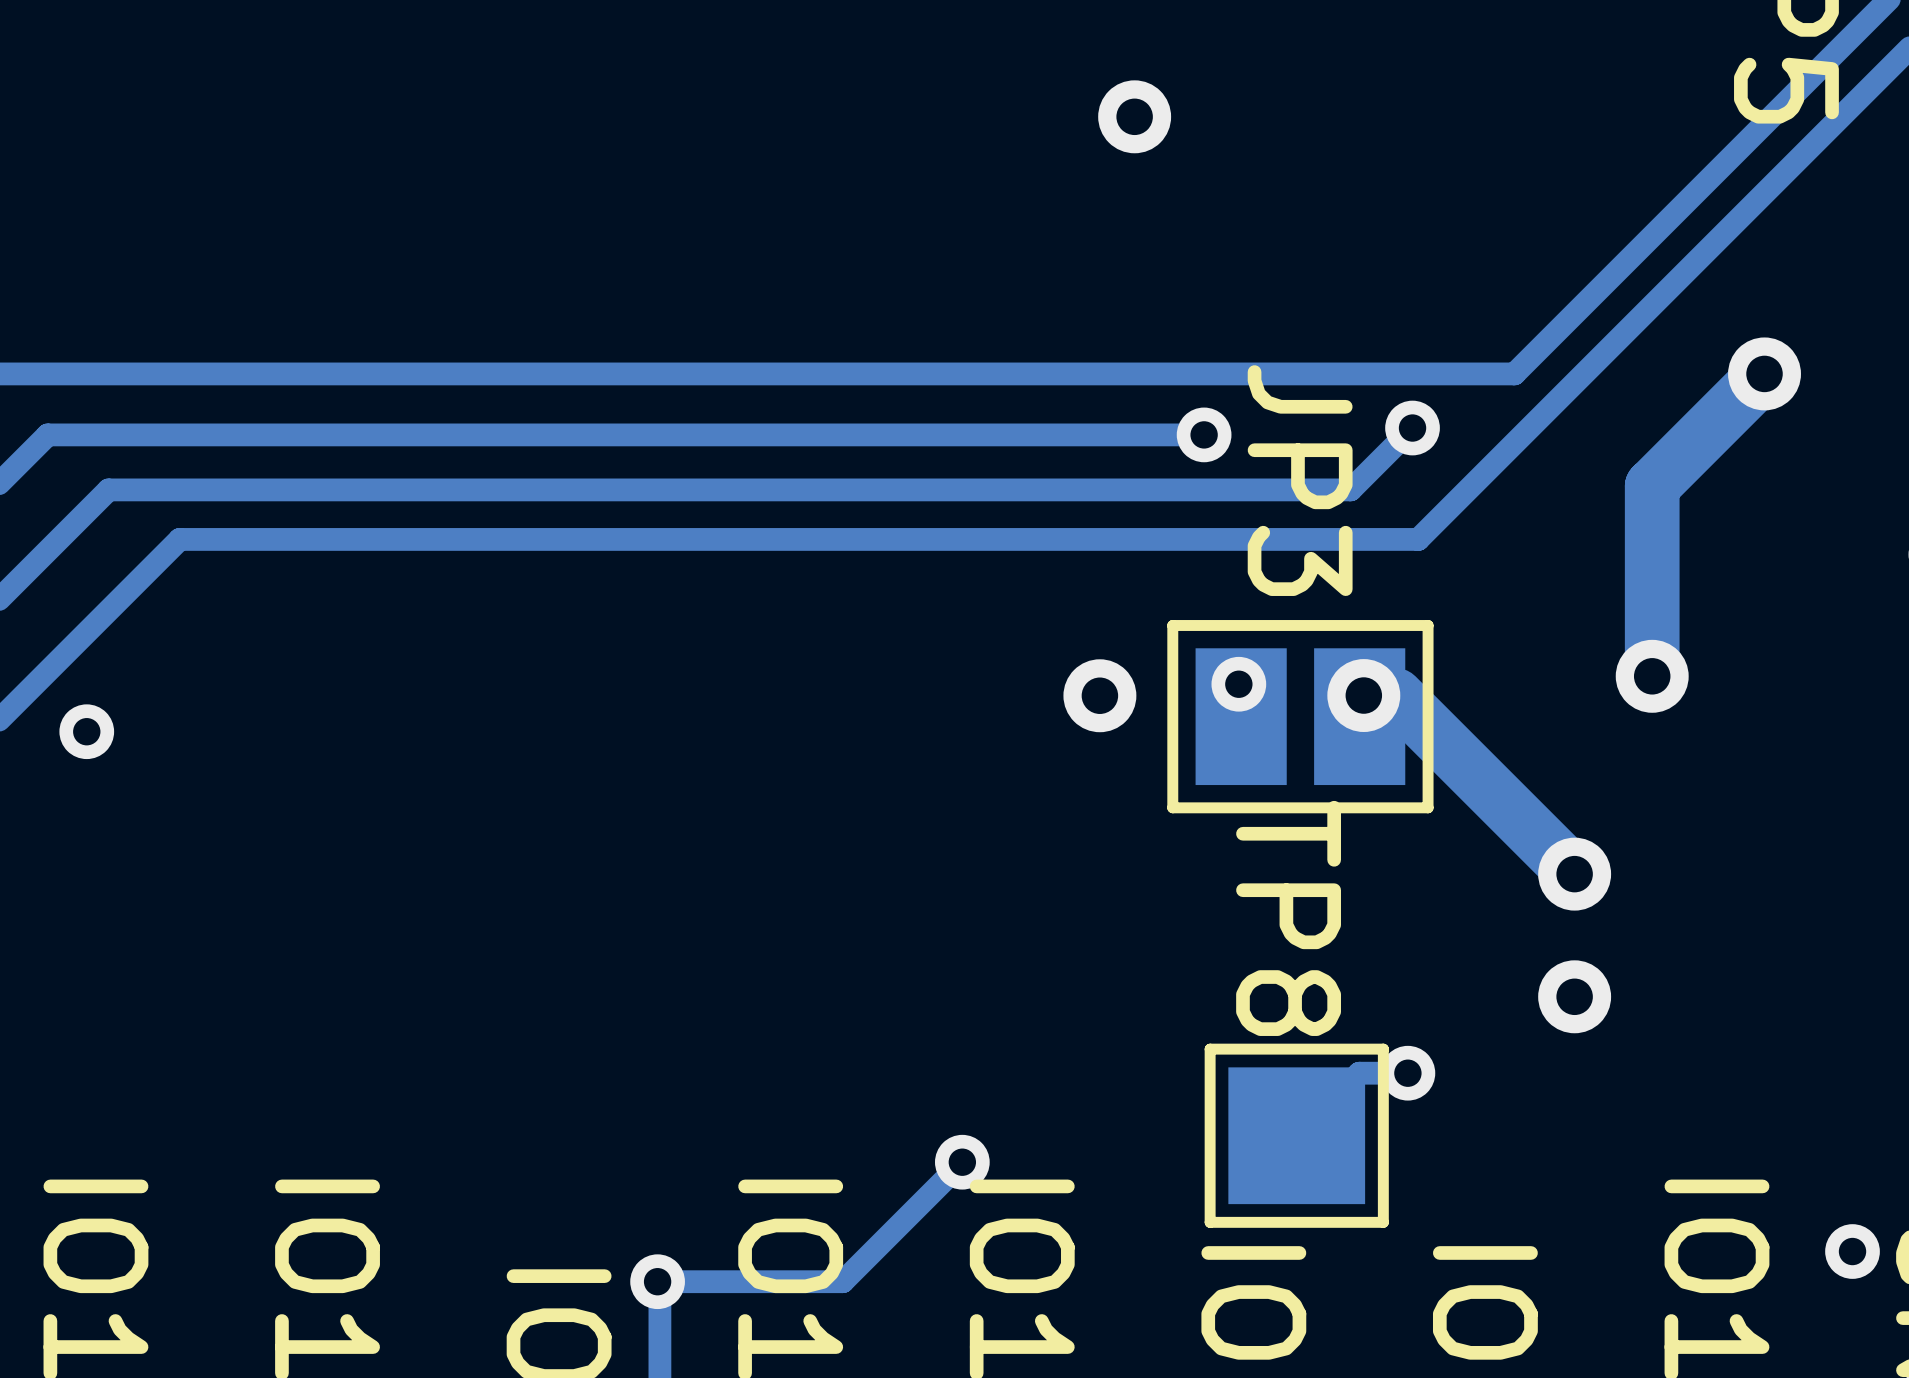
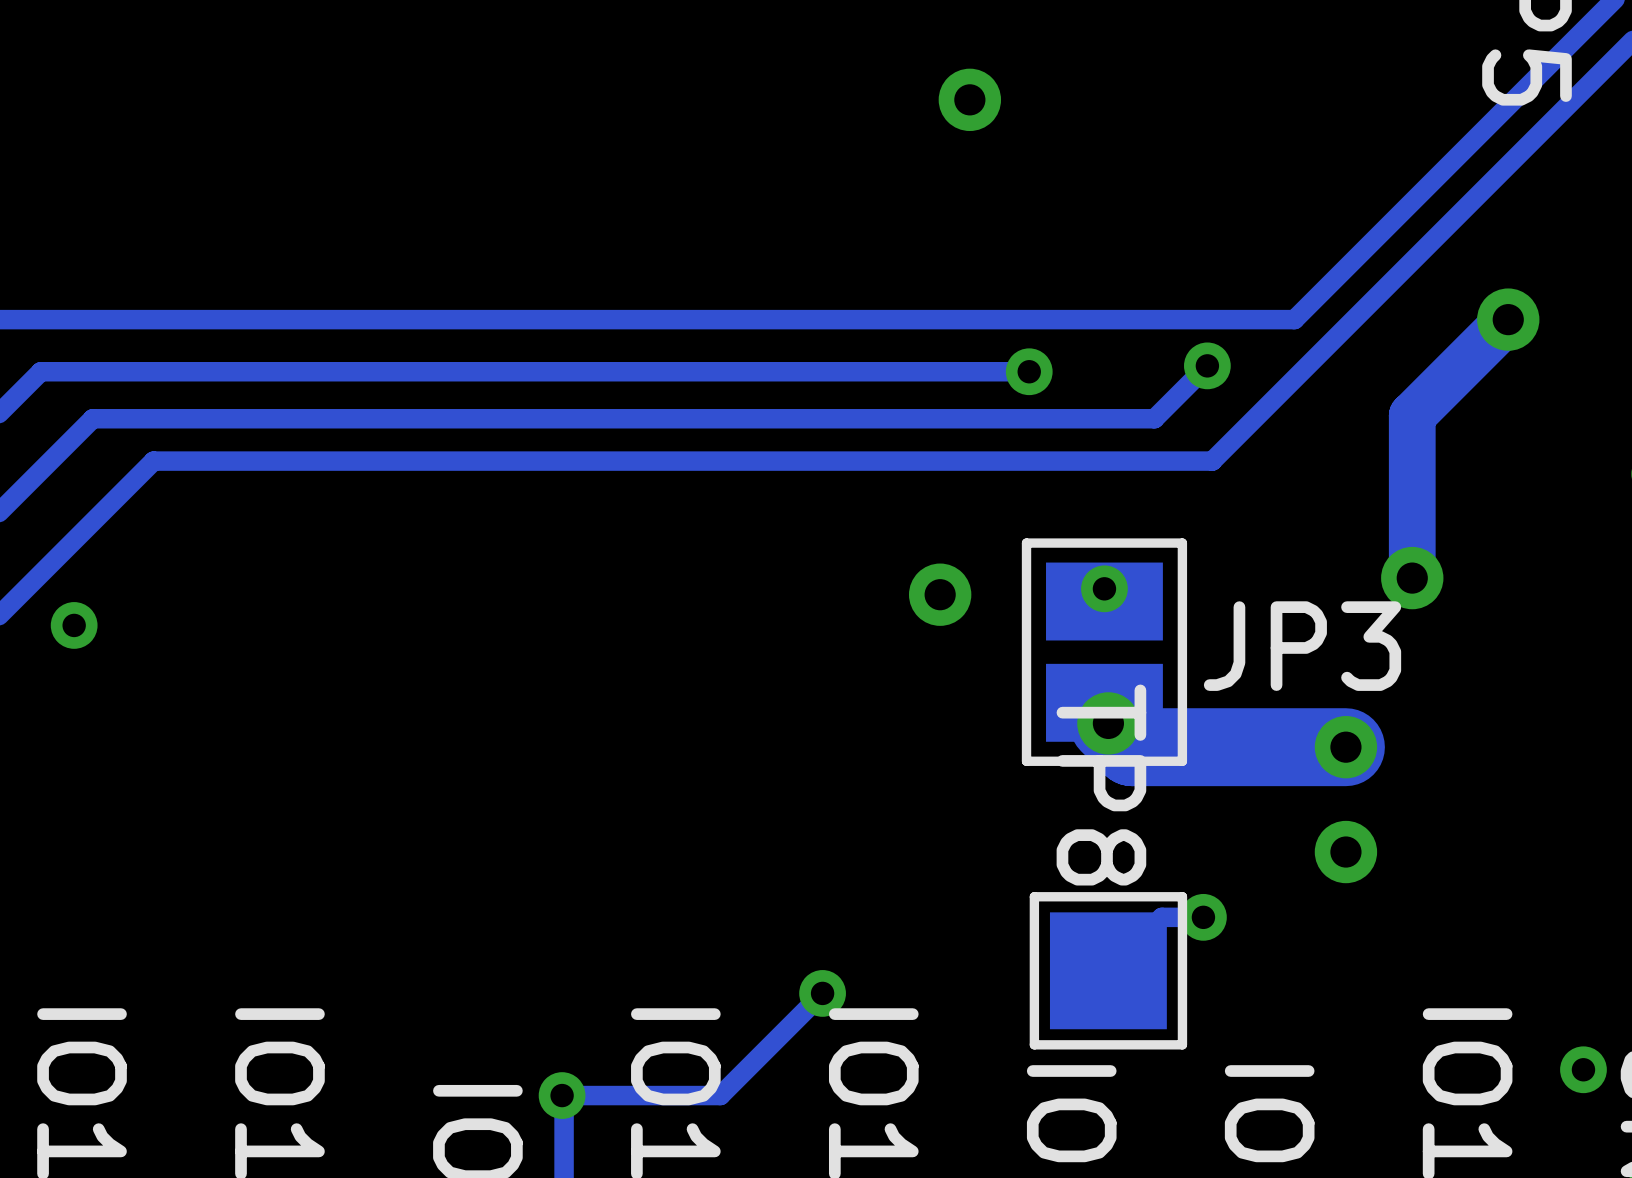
via position: (1238, 684) -> (1104, 588)
track: (1363, 695) (1396, 695) (1574, 874) -> (1108, 723) (1132, 747) (1345, 747)
via position: (1363, 695) -> (1108, 723)
JP3 rotation: 0° (1300, 716) -> 90° clockwise (1104, 652)

